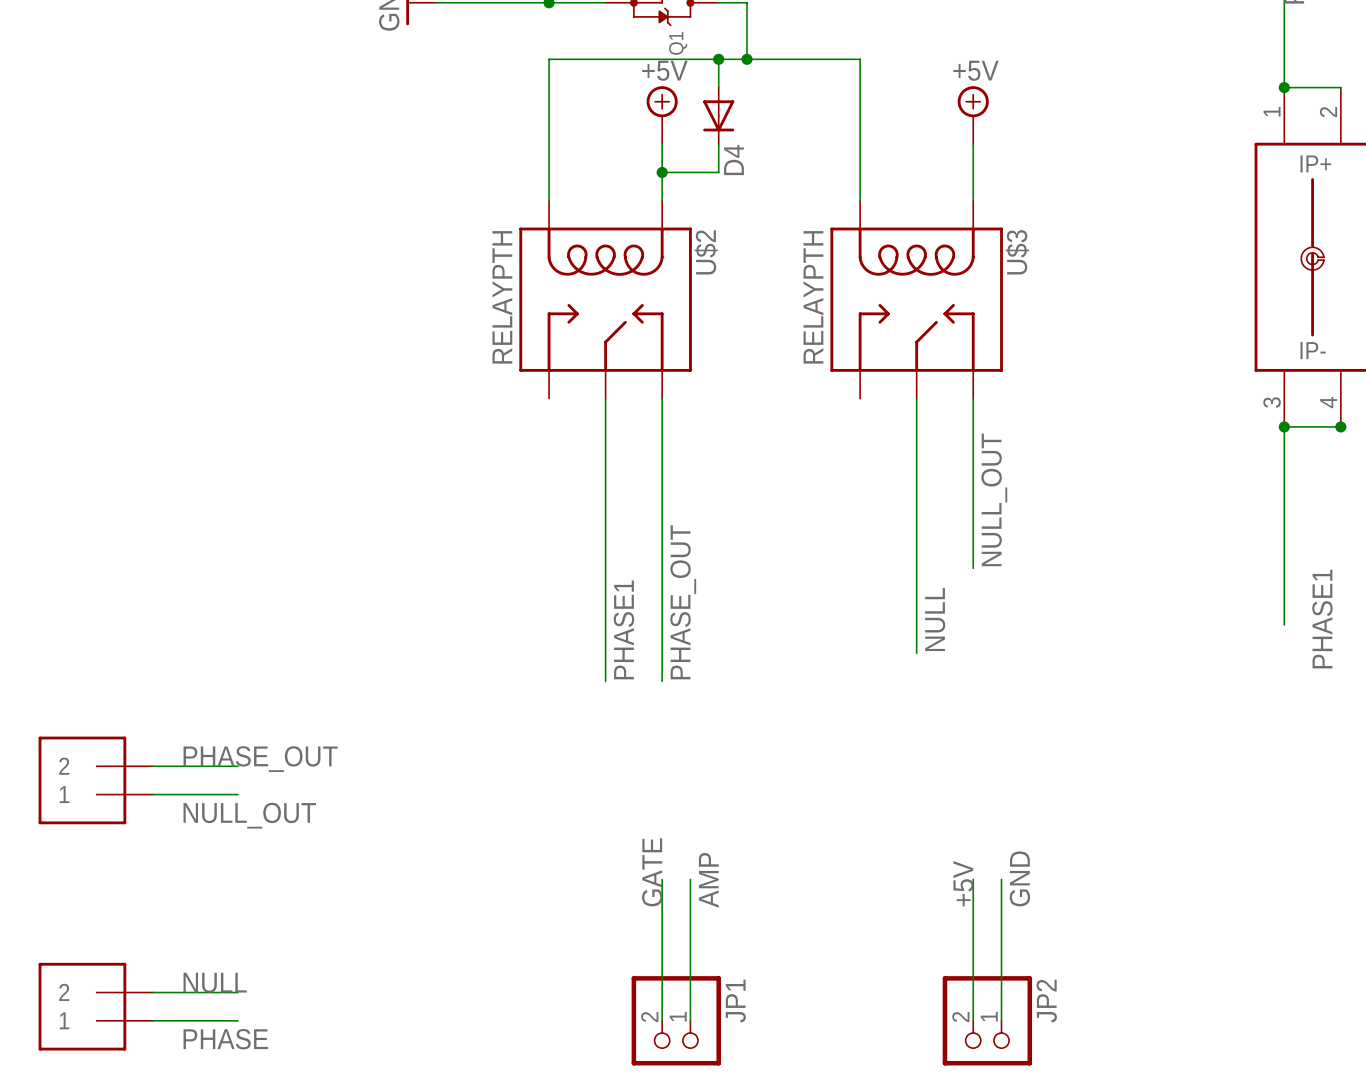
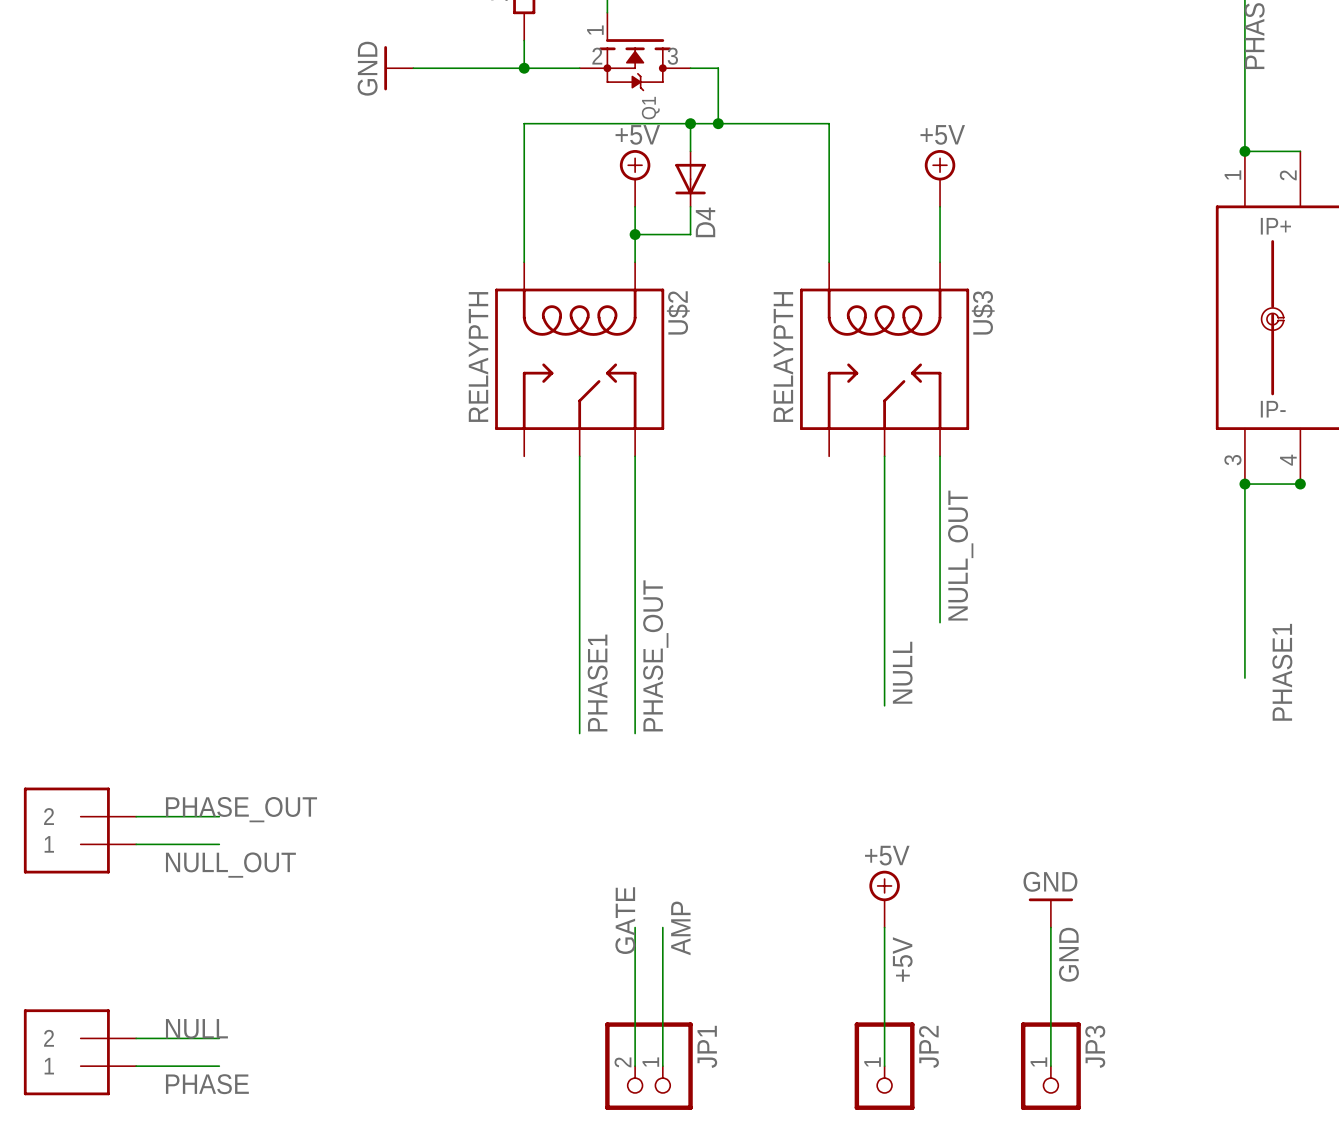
power symbol: none -> +5V (884, 899)
power symbol: none -> GND (1050, 913)
label position: GND (1019, 878) -> GND (1068, 954)
wire: (973, 879) (973, 1020) -> (884, 927) (884, 1066)
wire: (1001, 879) (1001, 1020) -> (1050, 927) (1050, 1066)
label position: +5V (963, 883) -> +5V (902, 959)
JP2 symbol: [942, 976, 1033, 1066] -> [854, 1022, 915, 1110]
JP3: none -> (1050, 1066)

